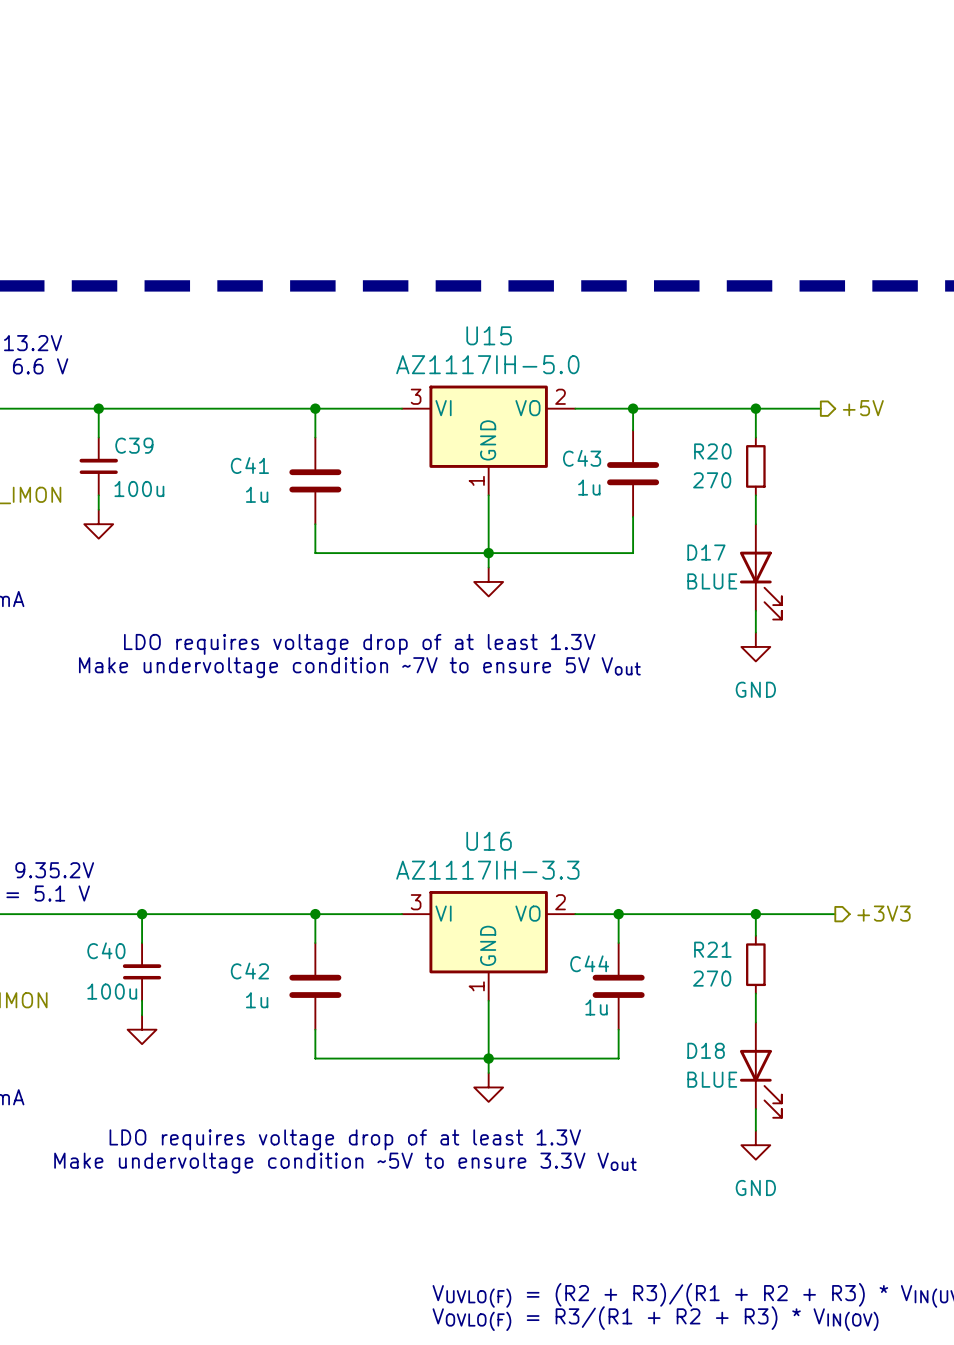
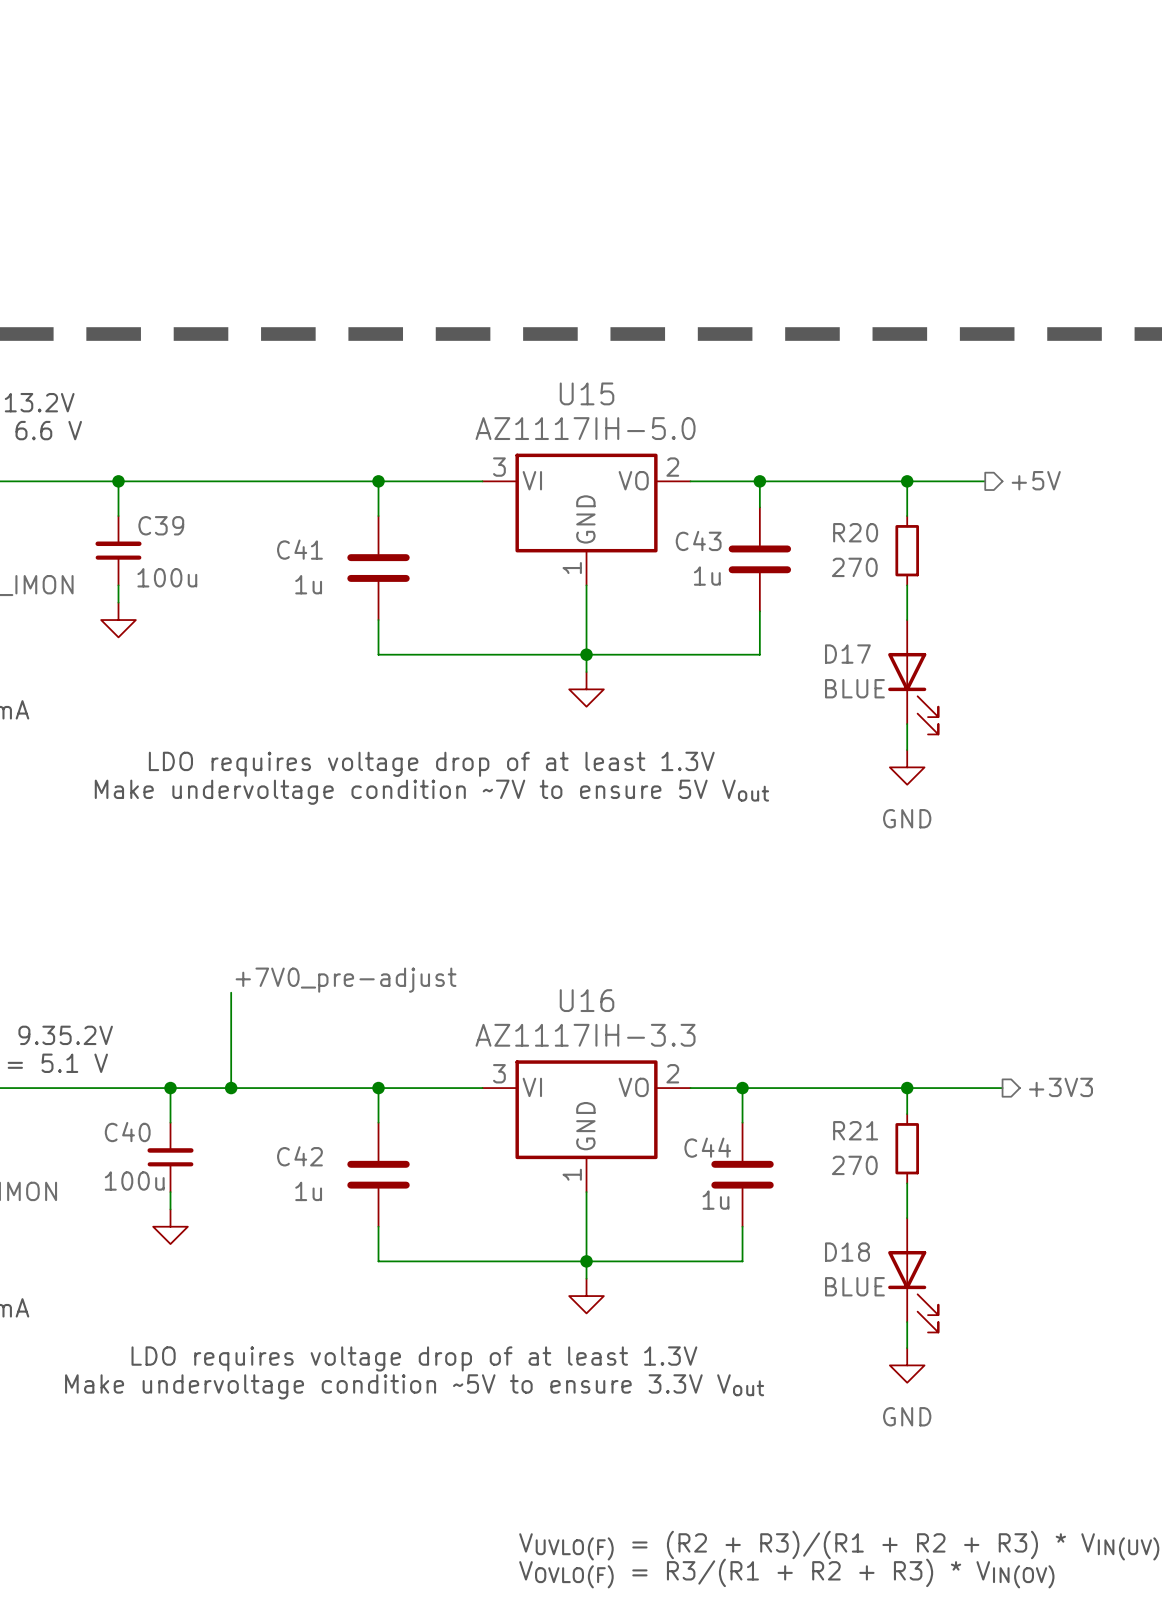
label: none -> +7V0_pre-adjust (346, 980)
wire: none -> (231, 992) (231, 1088)
junction: none -> (231, 1088)

